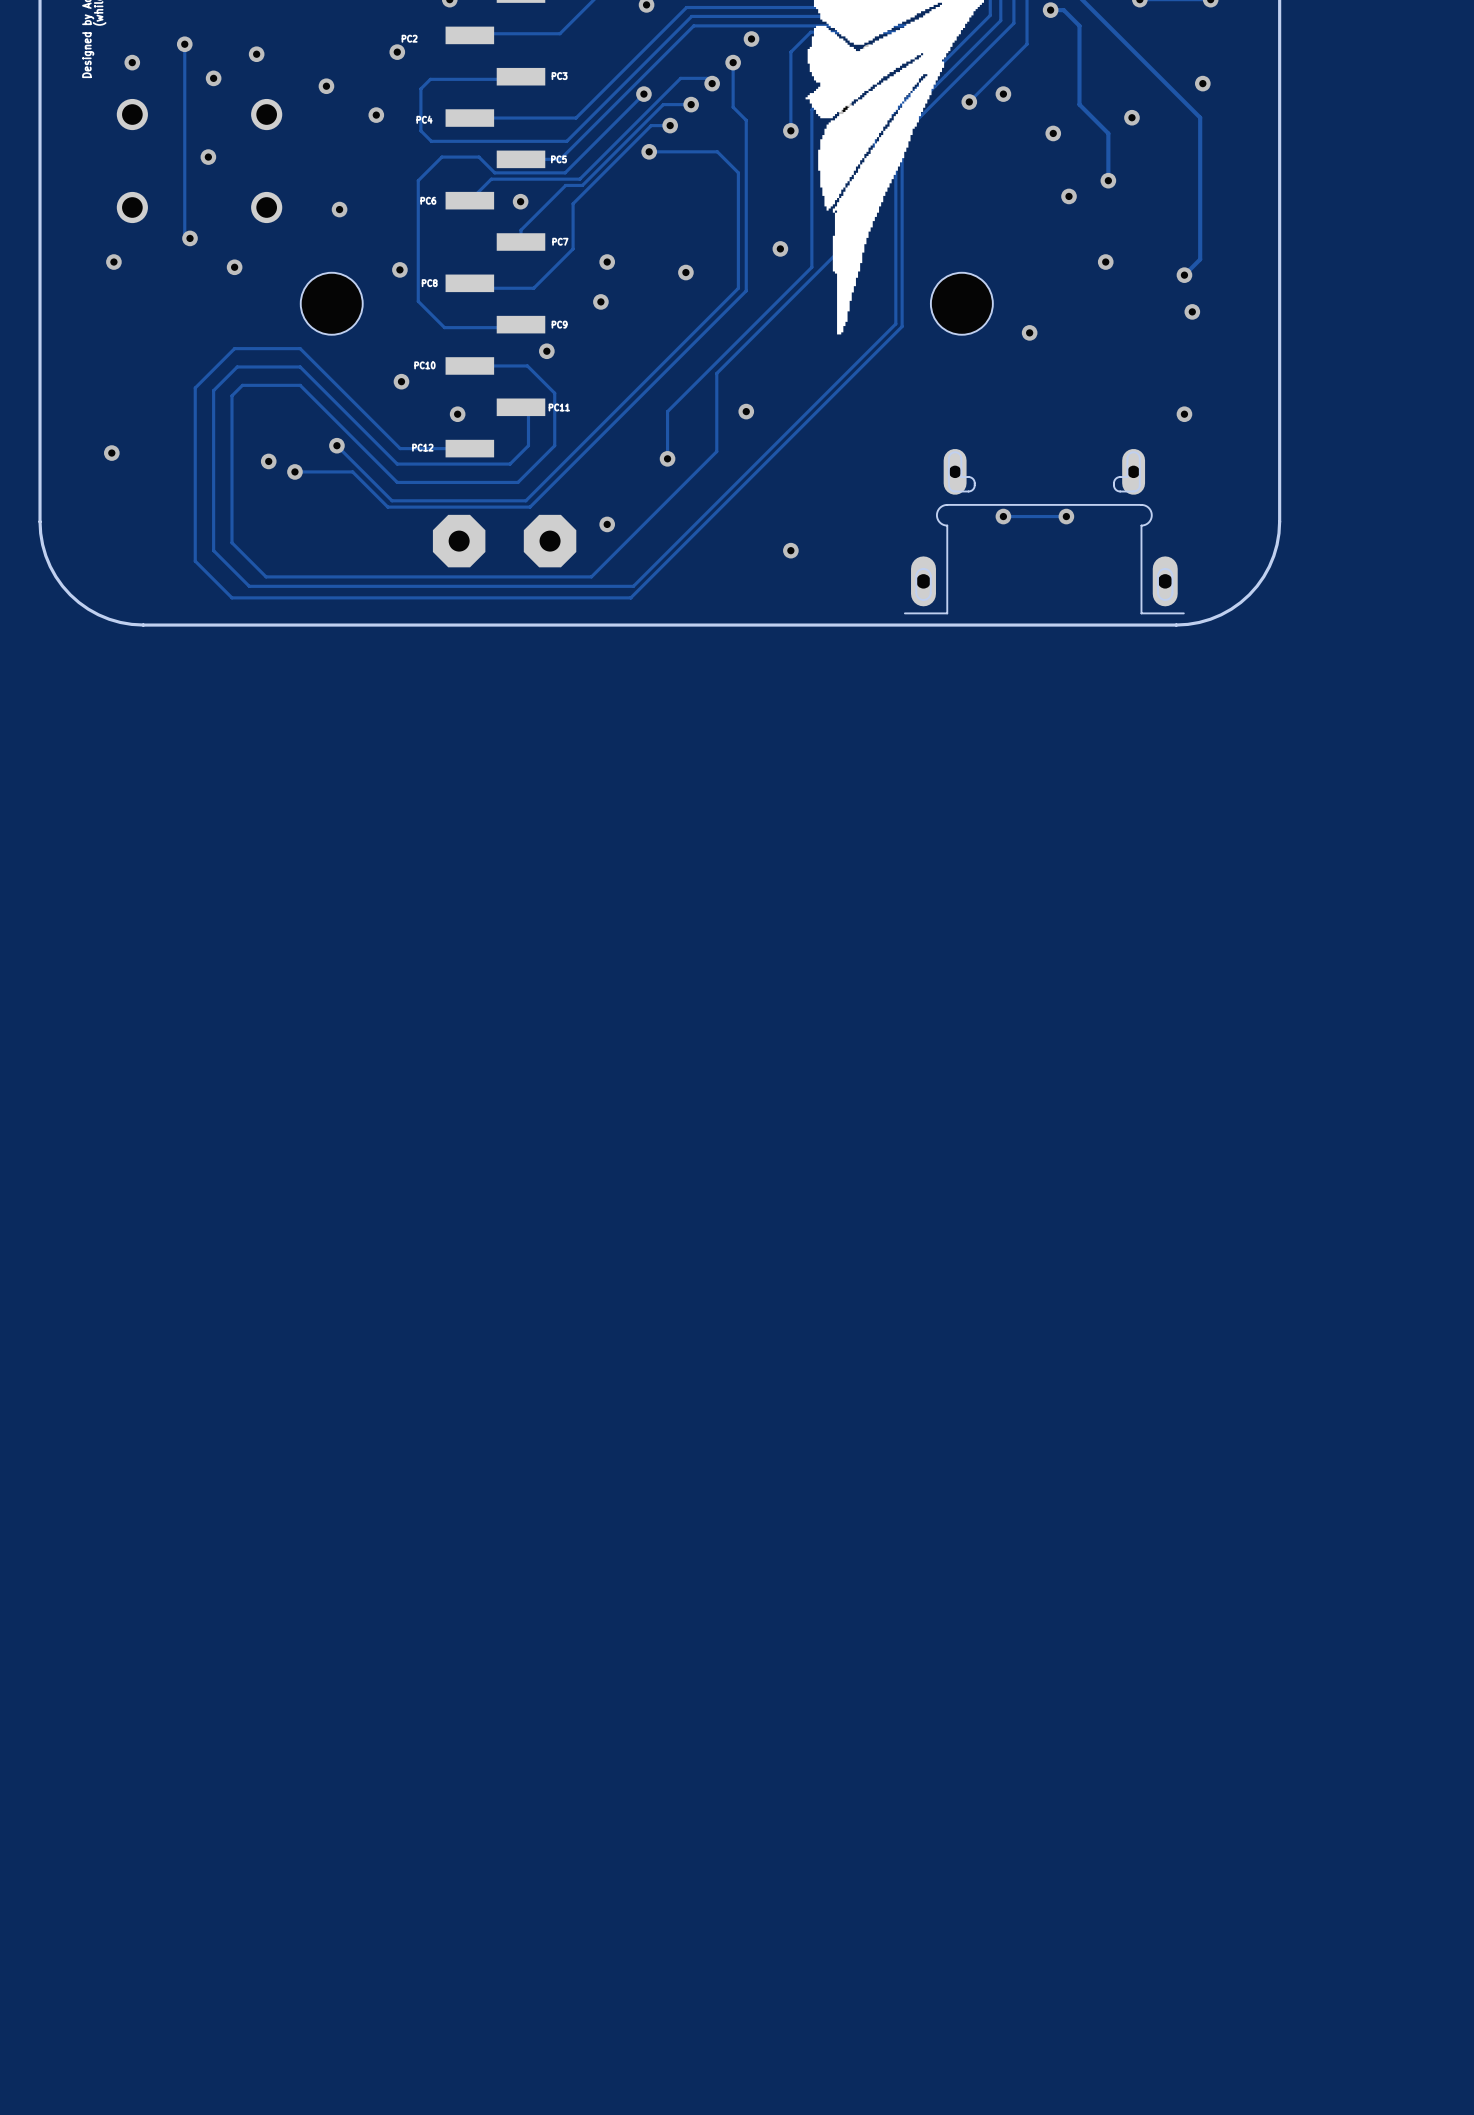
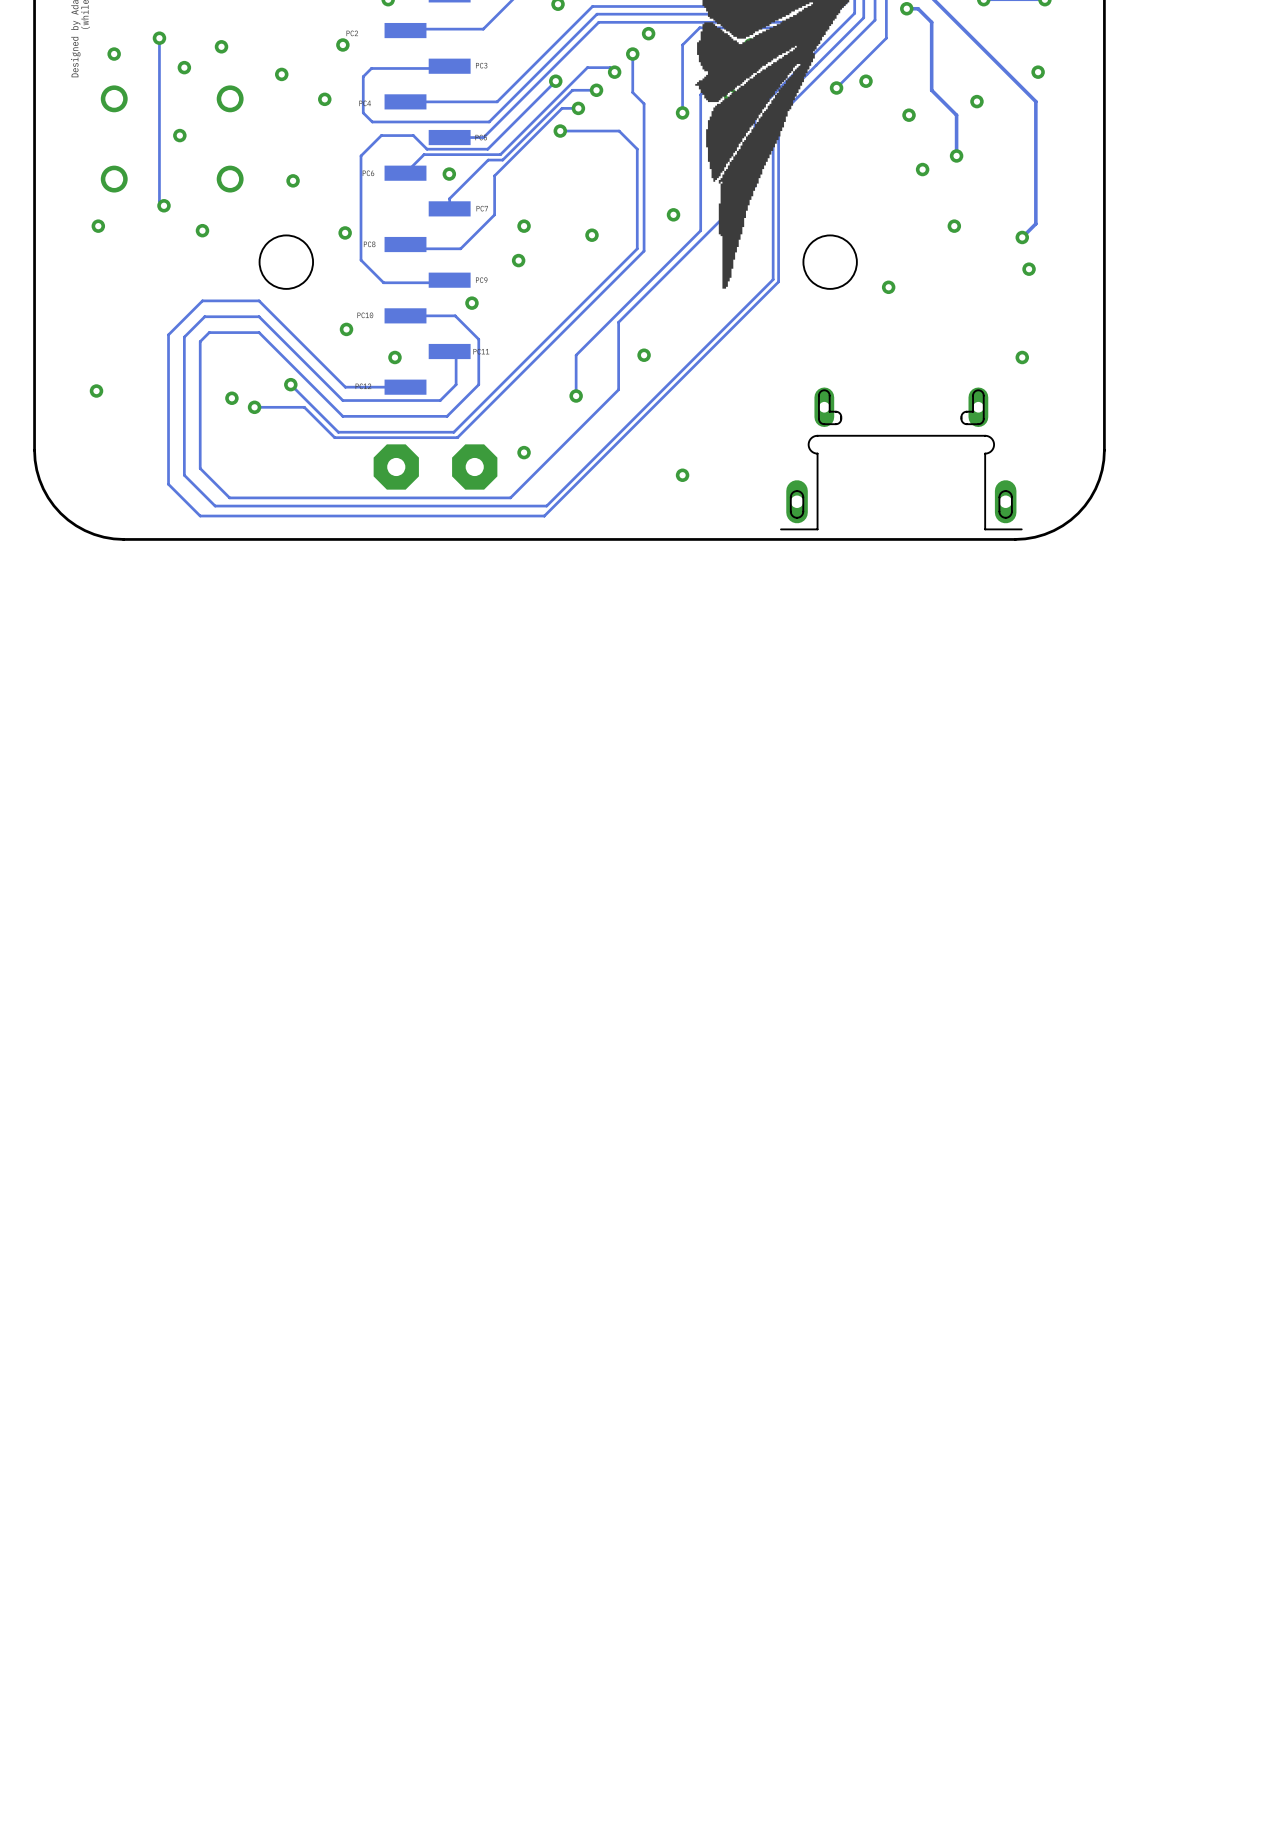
via: (1003, 516) -> none
track: (1066, 516) (1003, 516) -> none
via: (1066, 516) -> none

